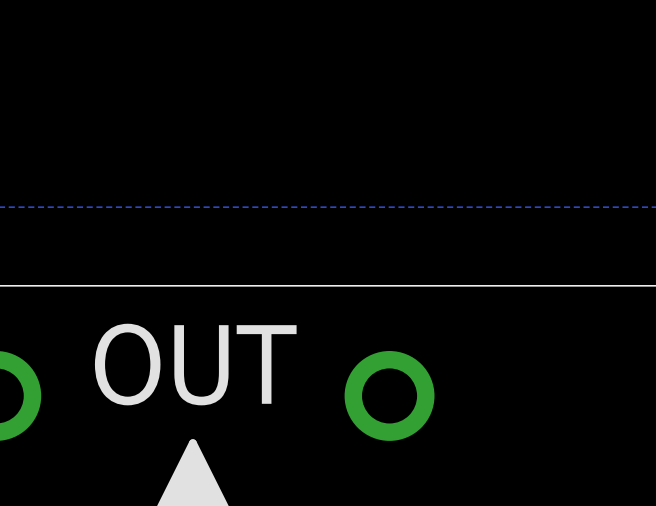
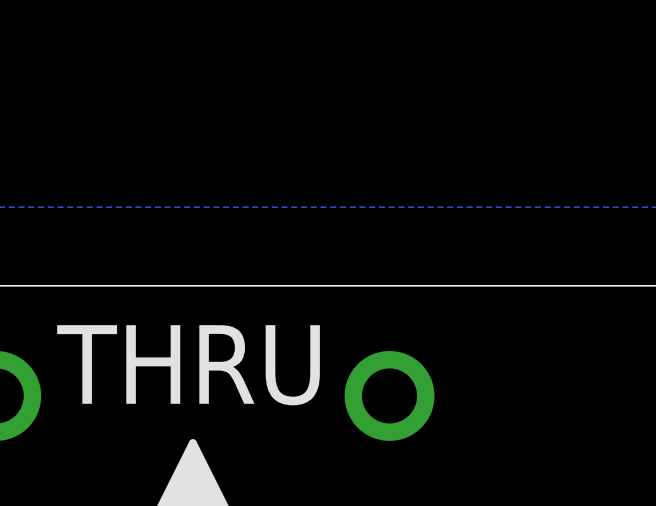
text: OUT (195, 364) -> THRU (188, 365)

